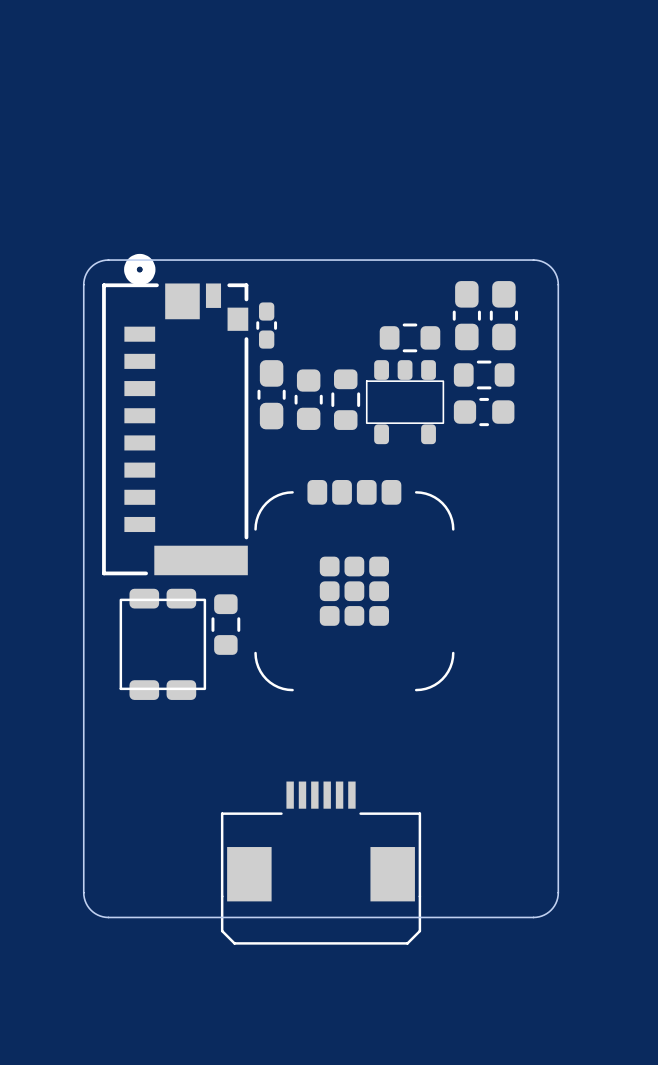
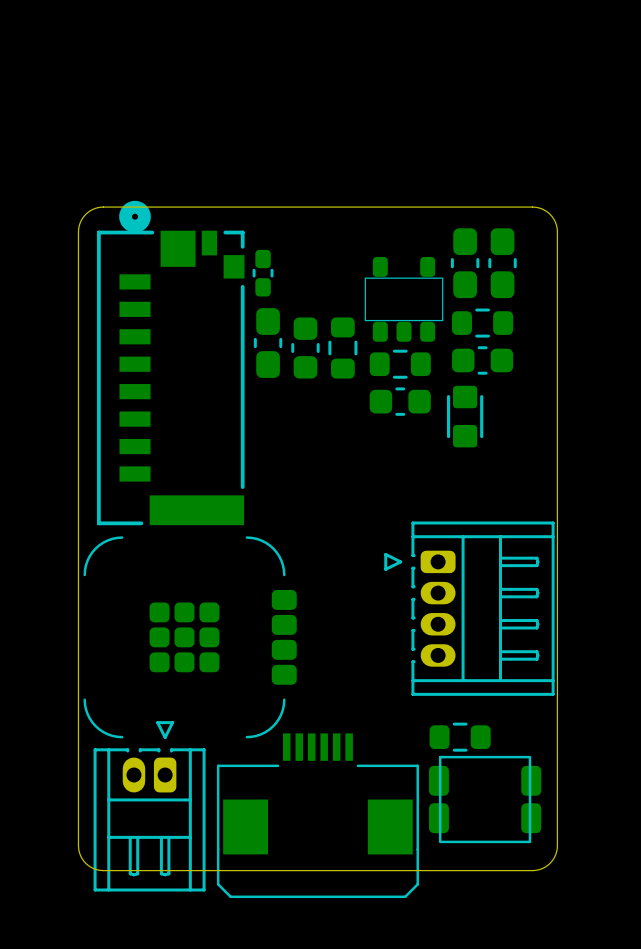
part footprint: [379, 323, 441, 353] -> [364, 256, 444, 342]
part footprint: [366, 360, 444, 445] -> [369, 349, 431, 379]
part: none -> (400, 401)
part: none -> (465, 416)
part rotation: 0° (354, 585) -> 90° clockwise (190, 637)
part position: (354, 585) -> (190, 637)
part rotation: 0° (225, 624) -> 90° clockwise (460, 737)
part position: (225, 624) -> (460, 737)
part rotation: 0° (162, 644) -> 90° clockwise (485, 799)
part position: (162, 644) -> (485, 799)
part: none -> (469, 608)
part: none -> (149, 806)

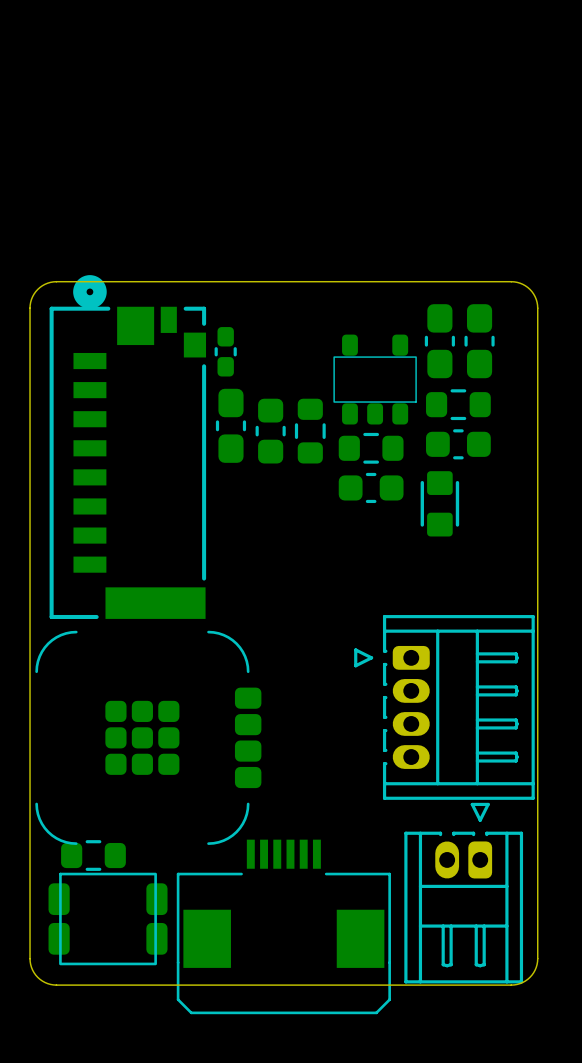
part footprint: [93, 721, 206, 892] -> [48, 872, 168, 966]
part position: (460, 737) -> (93, 855)
part footprint: [428, 755, 542, 844] -> [404, 802, 524, 984]

